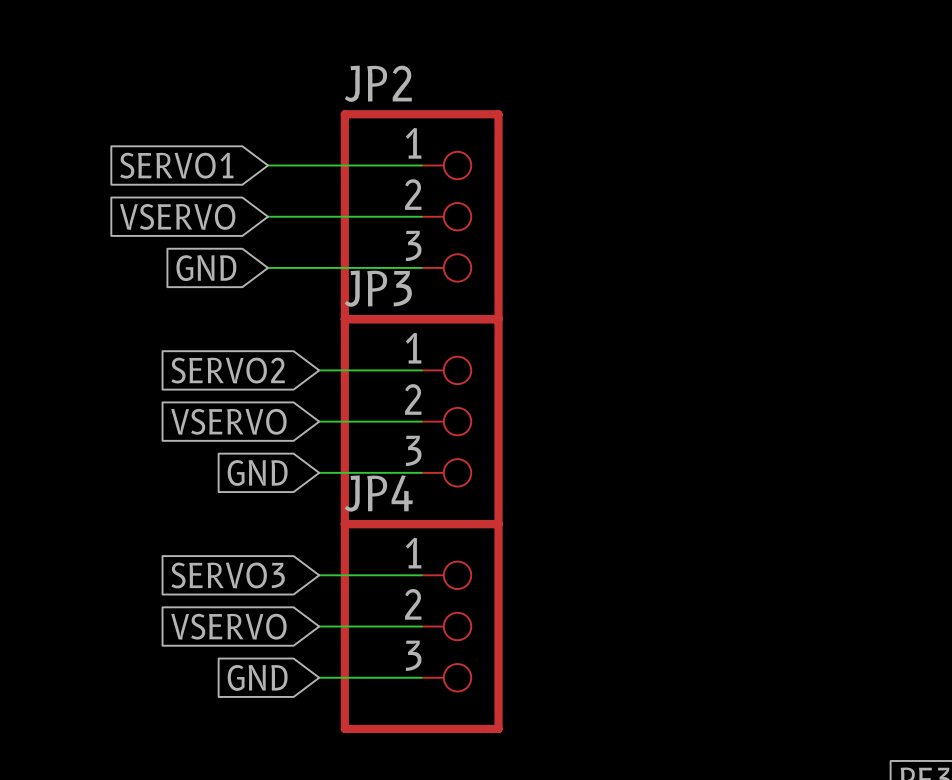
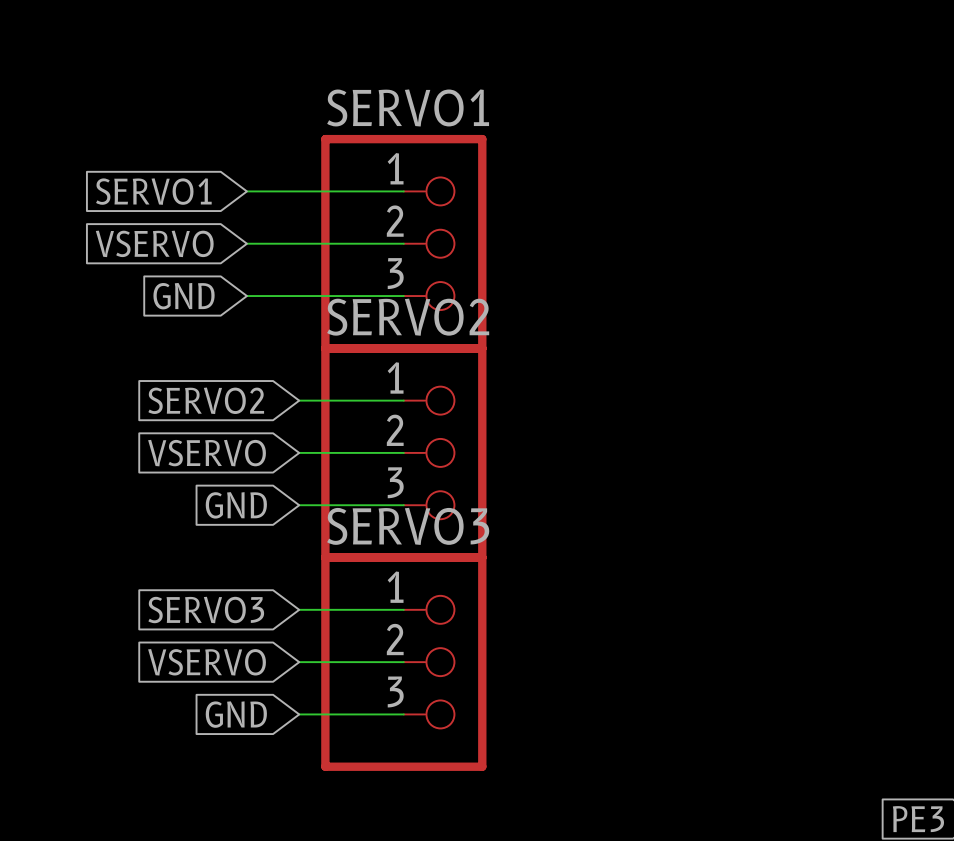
JP2 name: JP2 (378, 83) -> SERVO1 (408, 107)
JP3 name: JP3 (378, 288) -> SERVO2 (408, 317)
JP4 name: JP4 (378, 493) -> SERVO3 (408, 526)

